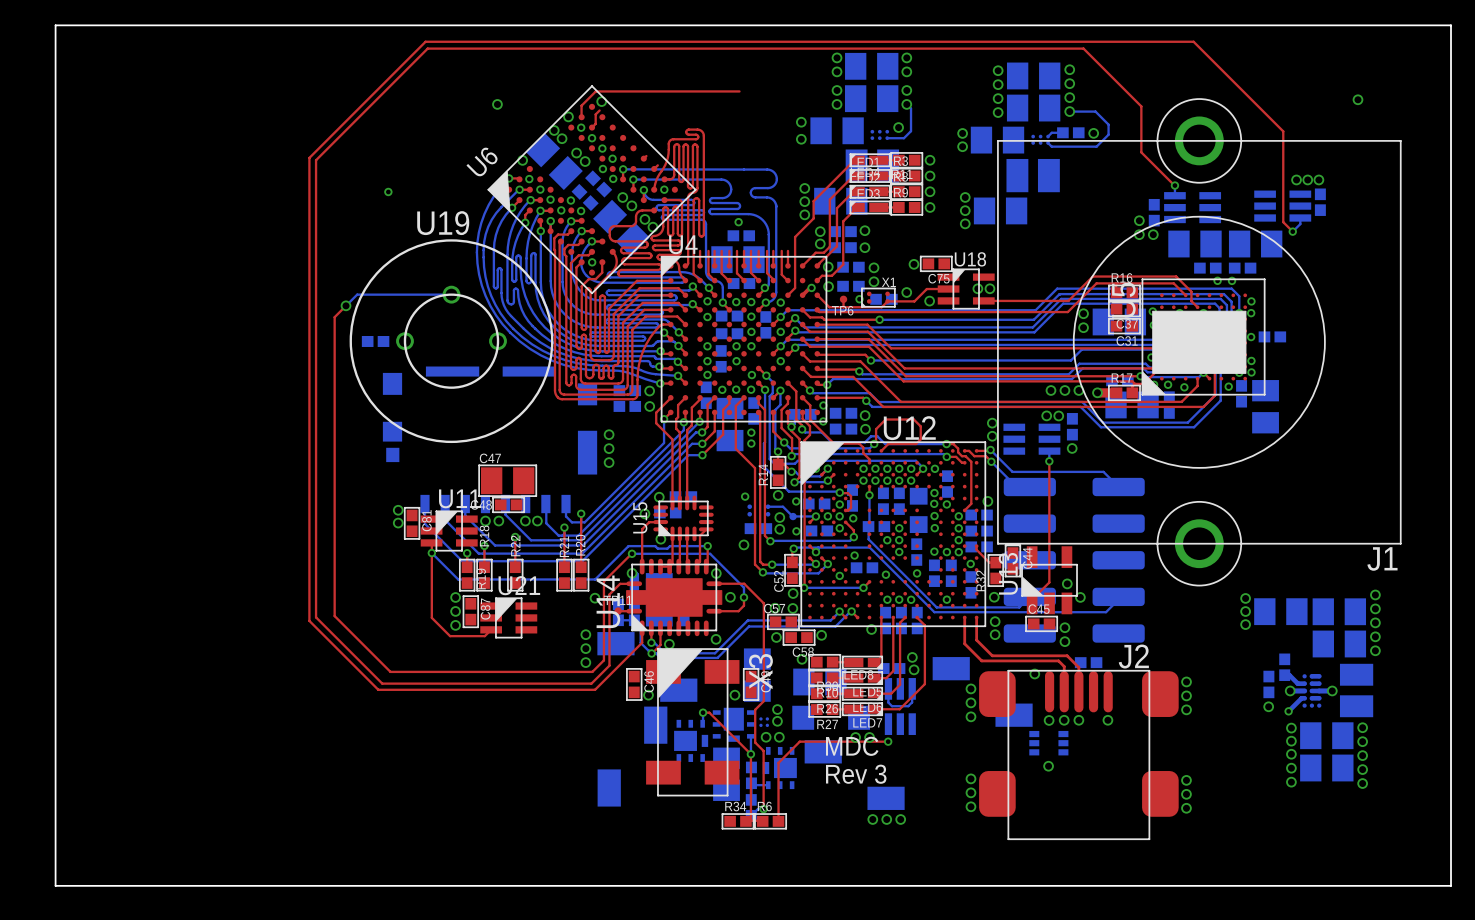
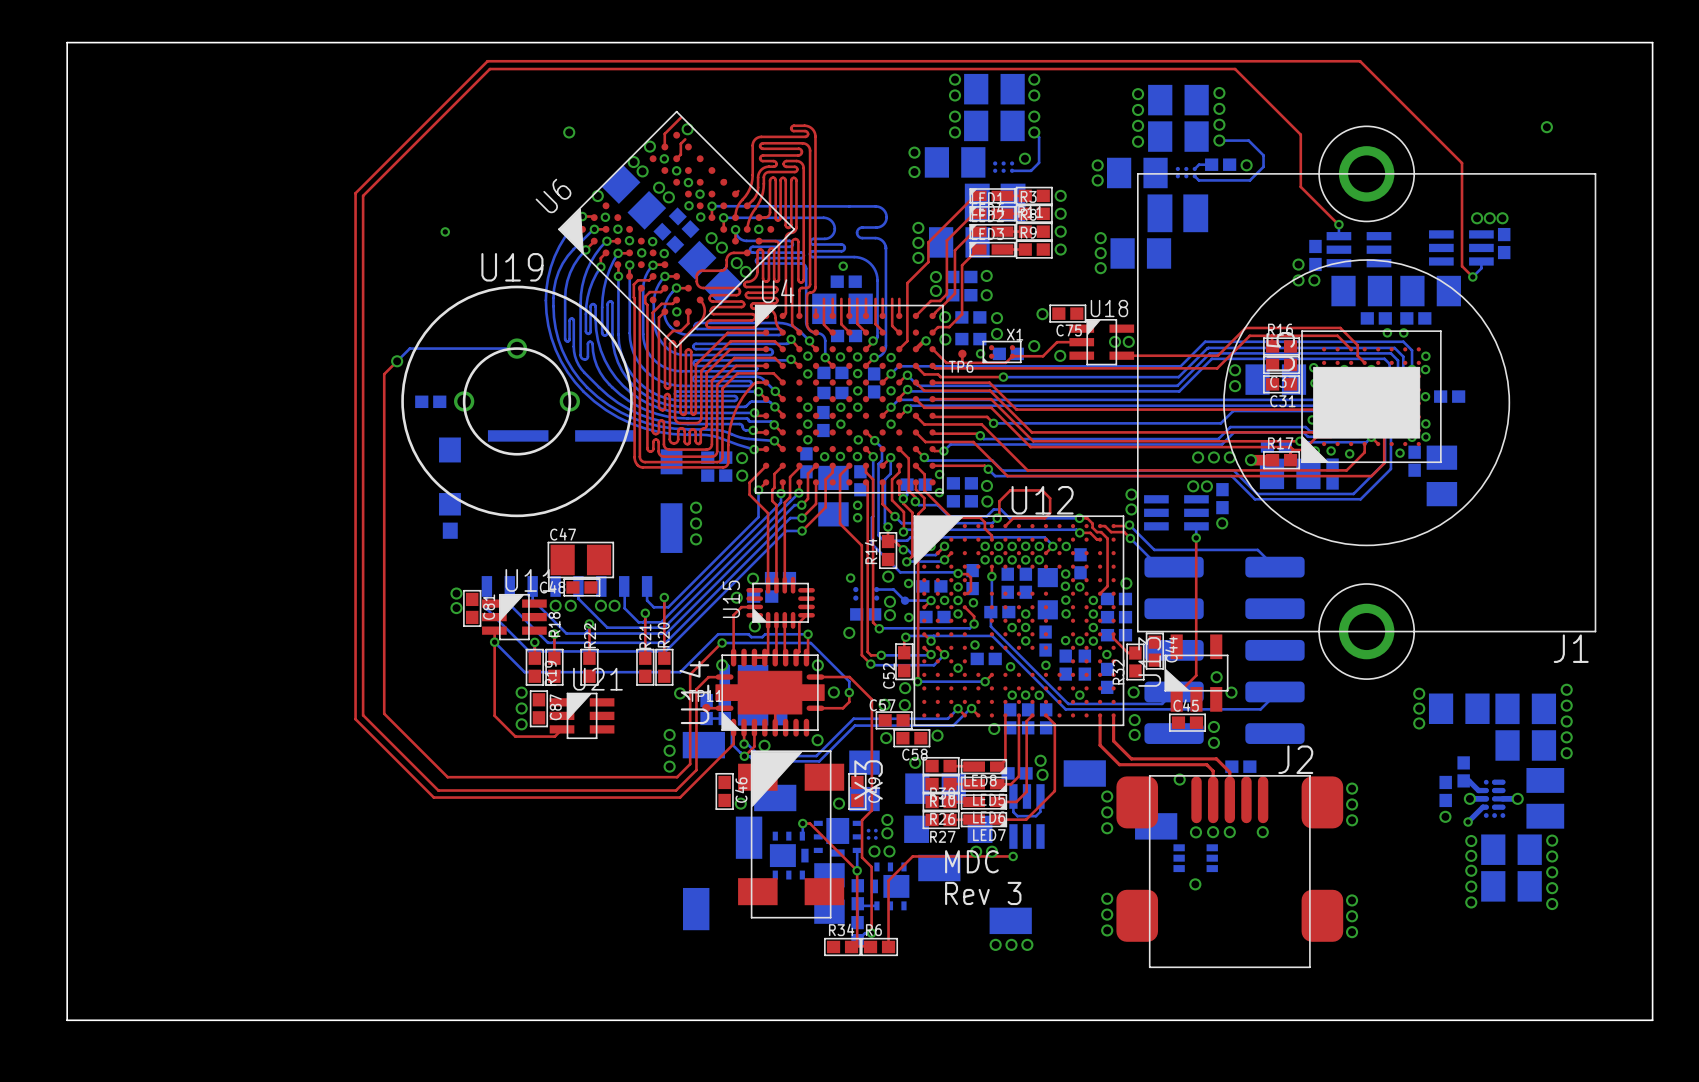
top track: (595, 91) (739, 91) -> none
top track: none -> (751, 201) (757, 192) (760, 170) (764, 167) (776, 164) (774, 161) (761, 160) (761, 156) (798, 155) (801, 152) (799, 148) (762, 148) (760, 144) (802, 143) (807, 145) (810, 150) (810, 284) (807, 287) (799, 289) (799, 298)
top track: (708, 250) (708, 274) (714, 280) -> (735, 217) (737, 207) (751, 184) (754, 140) (760, 136) (806, 136) (808, 134) (806, 131) (793, 130) (791, 127) (804, 125) (811, 127) (815, 136) (815, 287) (813, 291) (807, 295) (807, 323) (809, 329) (816, 332)
top track: (714, 250) (714, 260) -> none

